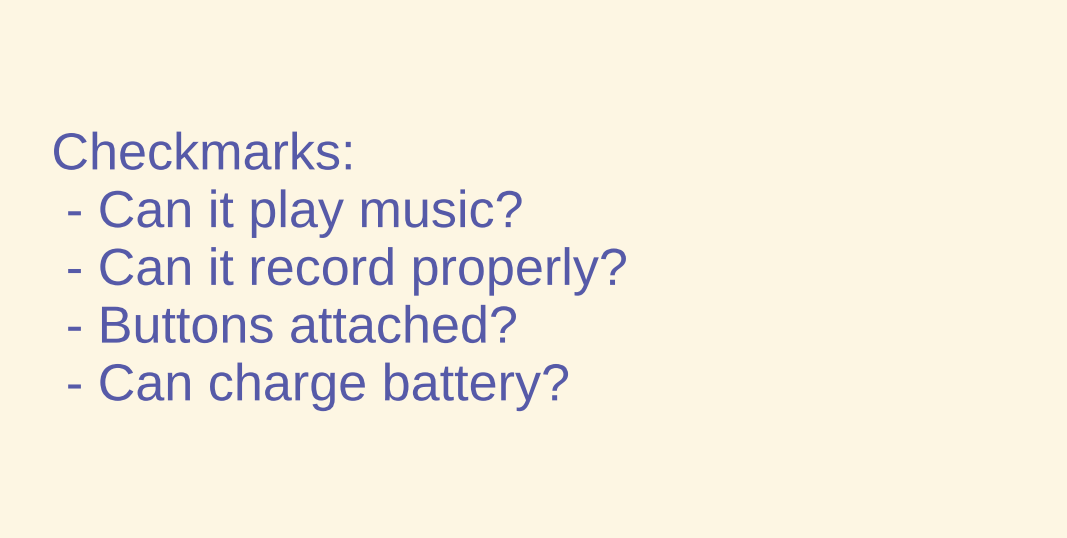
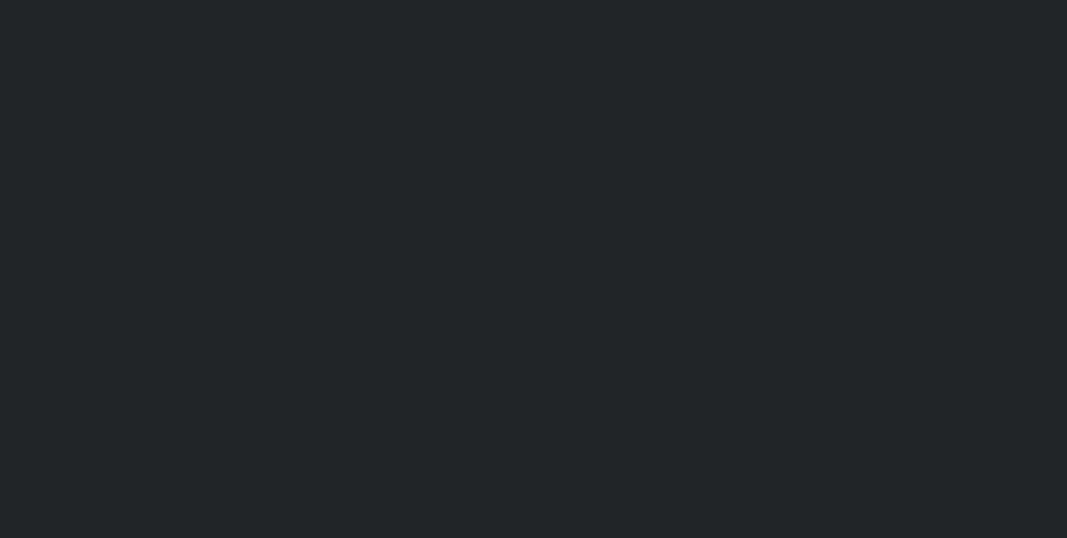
text: Checkmarks: (202, 150) -> none
text: - Can it play music? (294, 213) -> none
text: - Can it record properly? (347, 271) -> none
text: - Buttons attached? (292, 323) -> none
text: - Can charge battery? (318, 386) -> none

